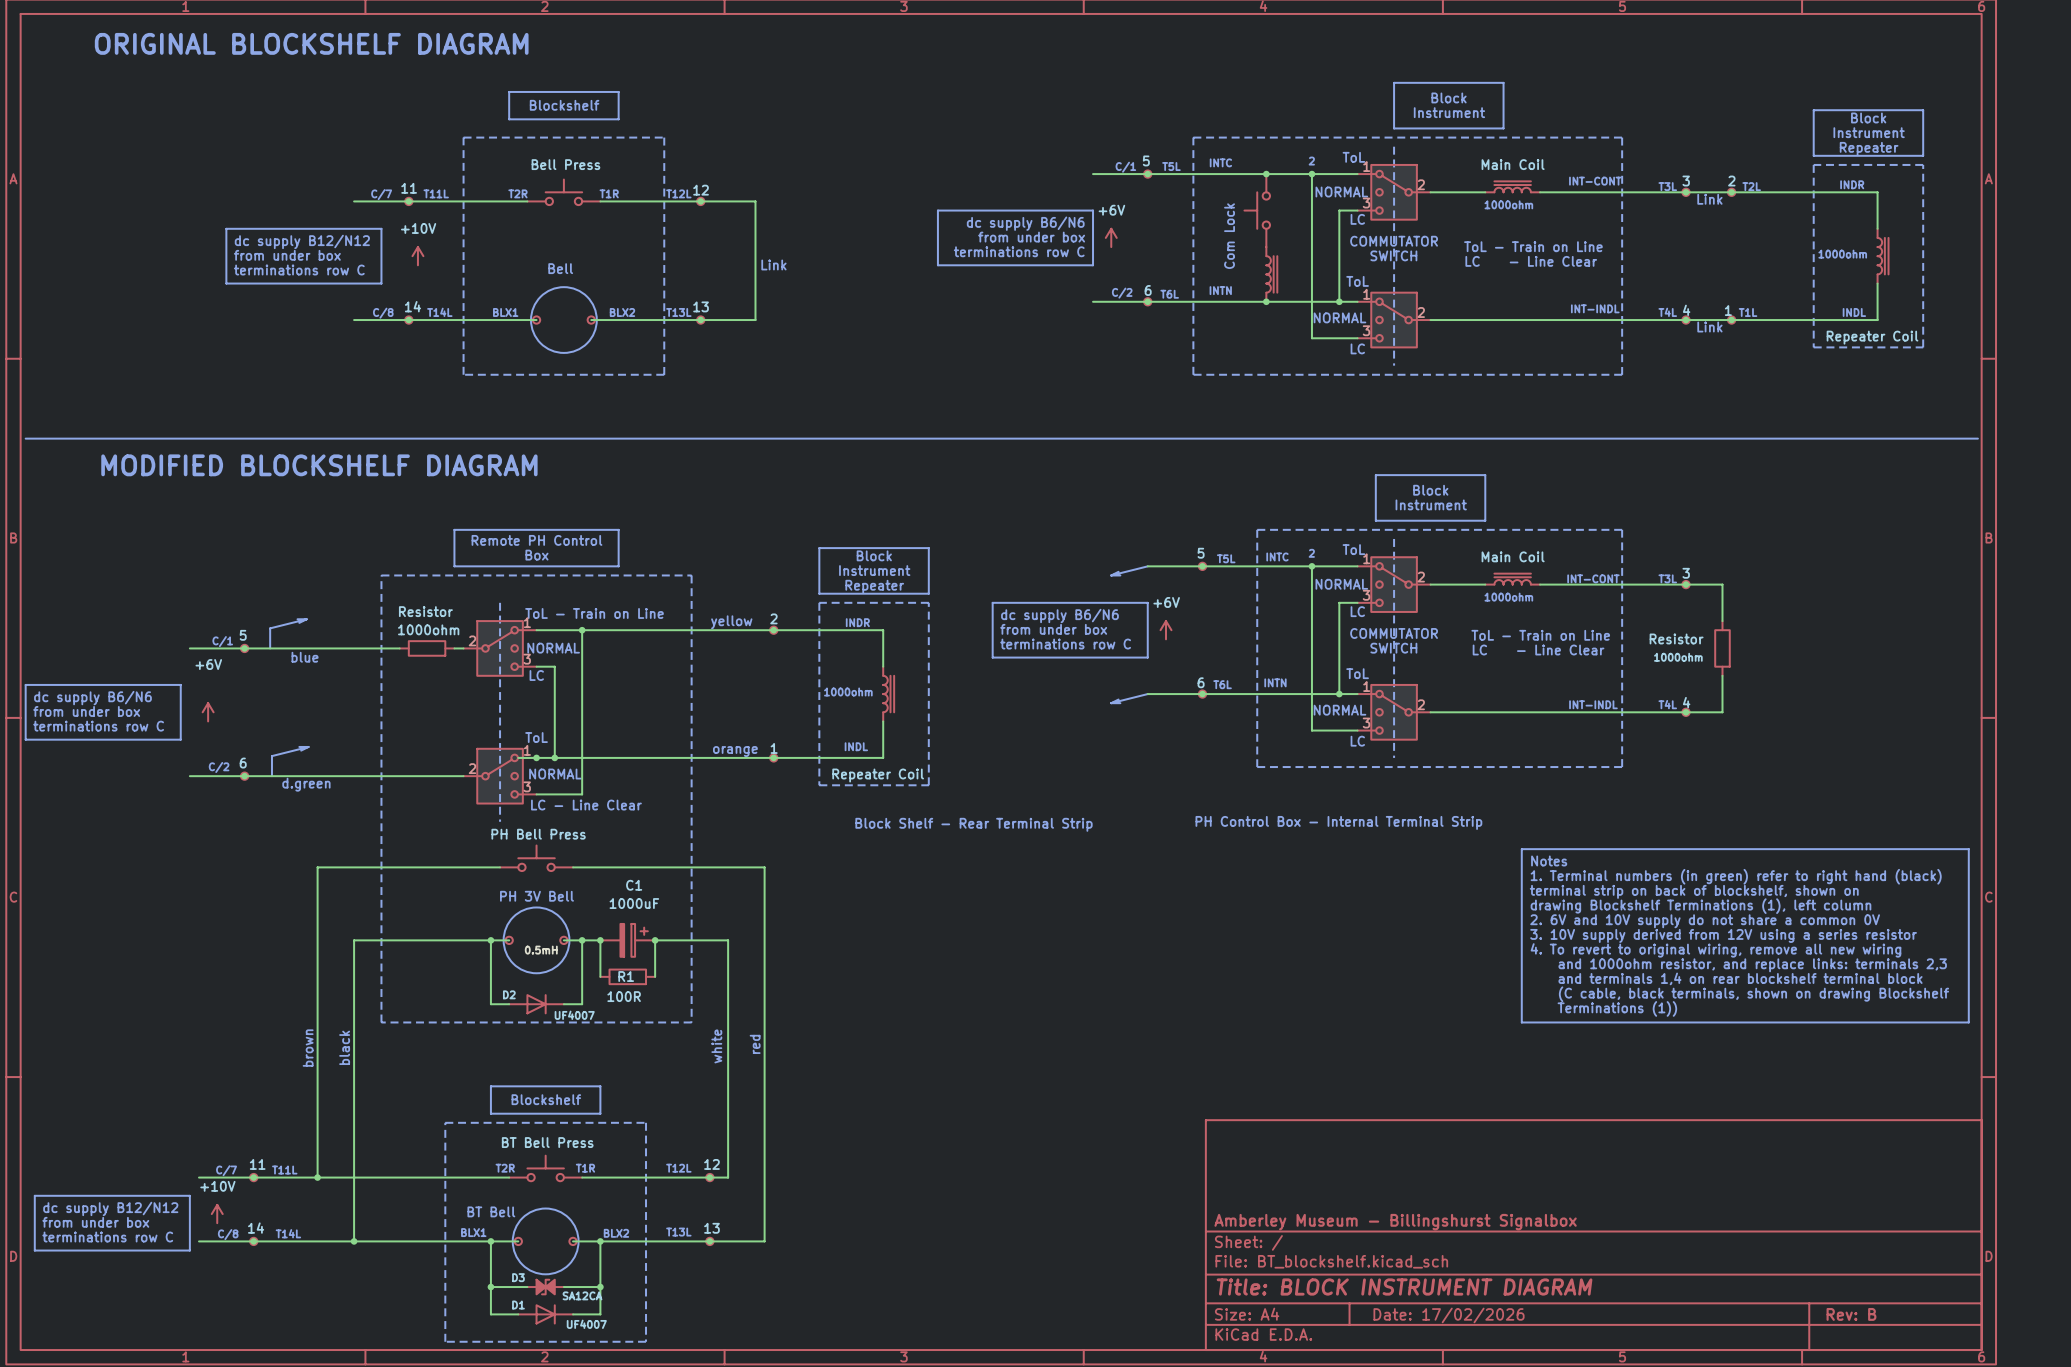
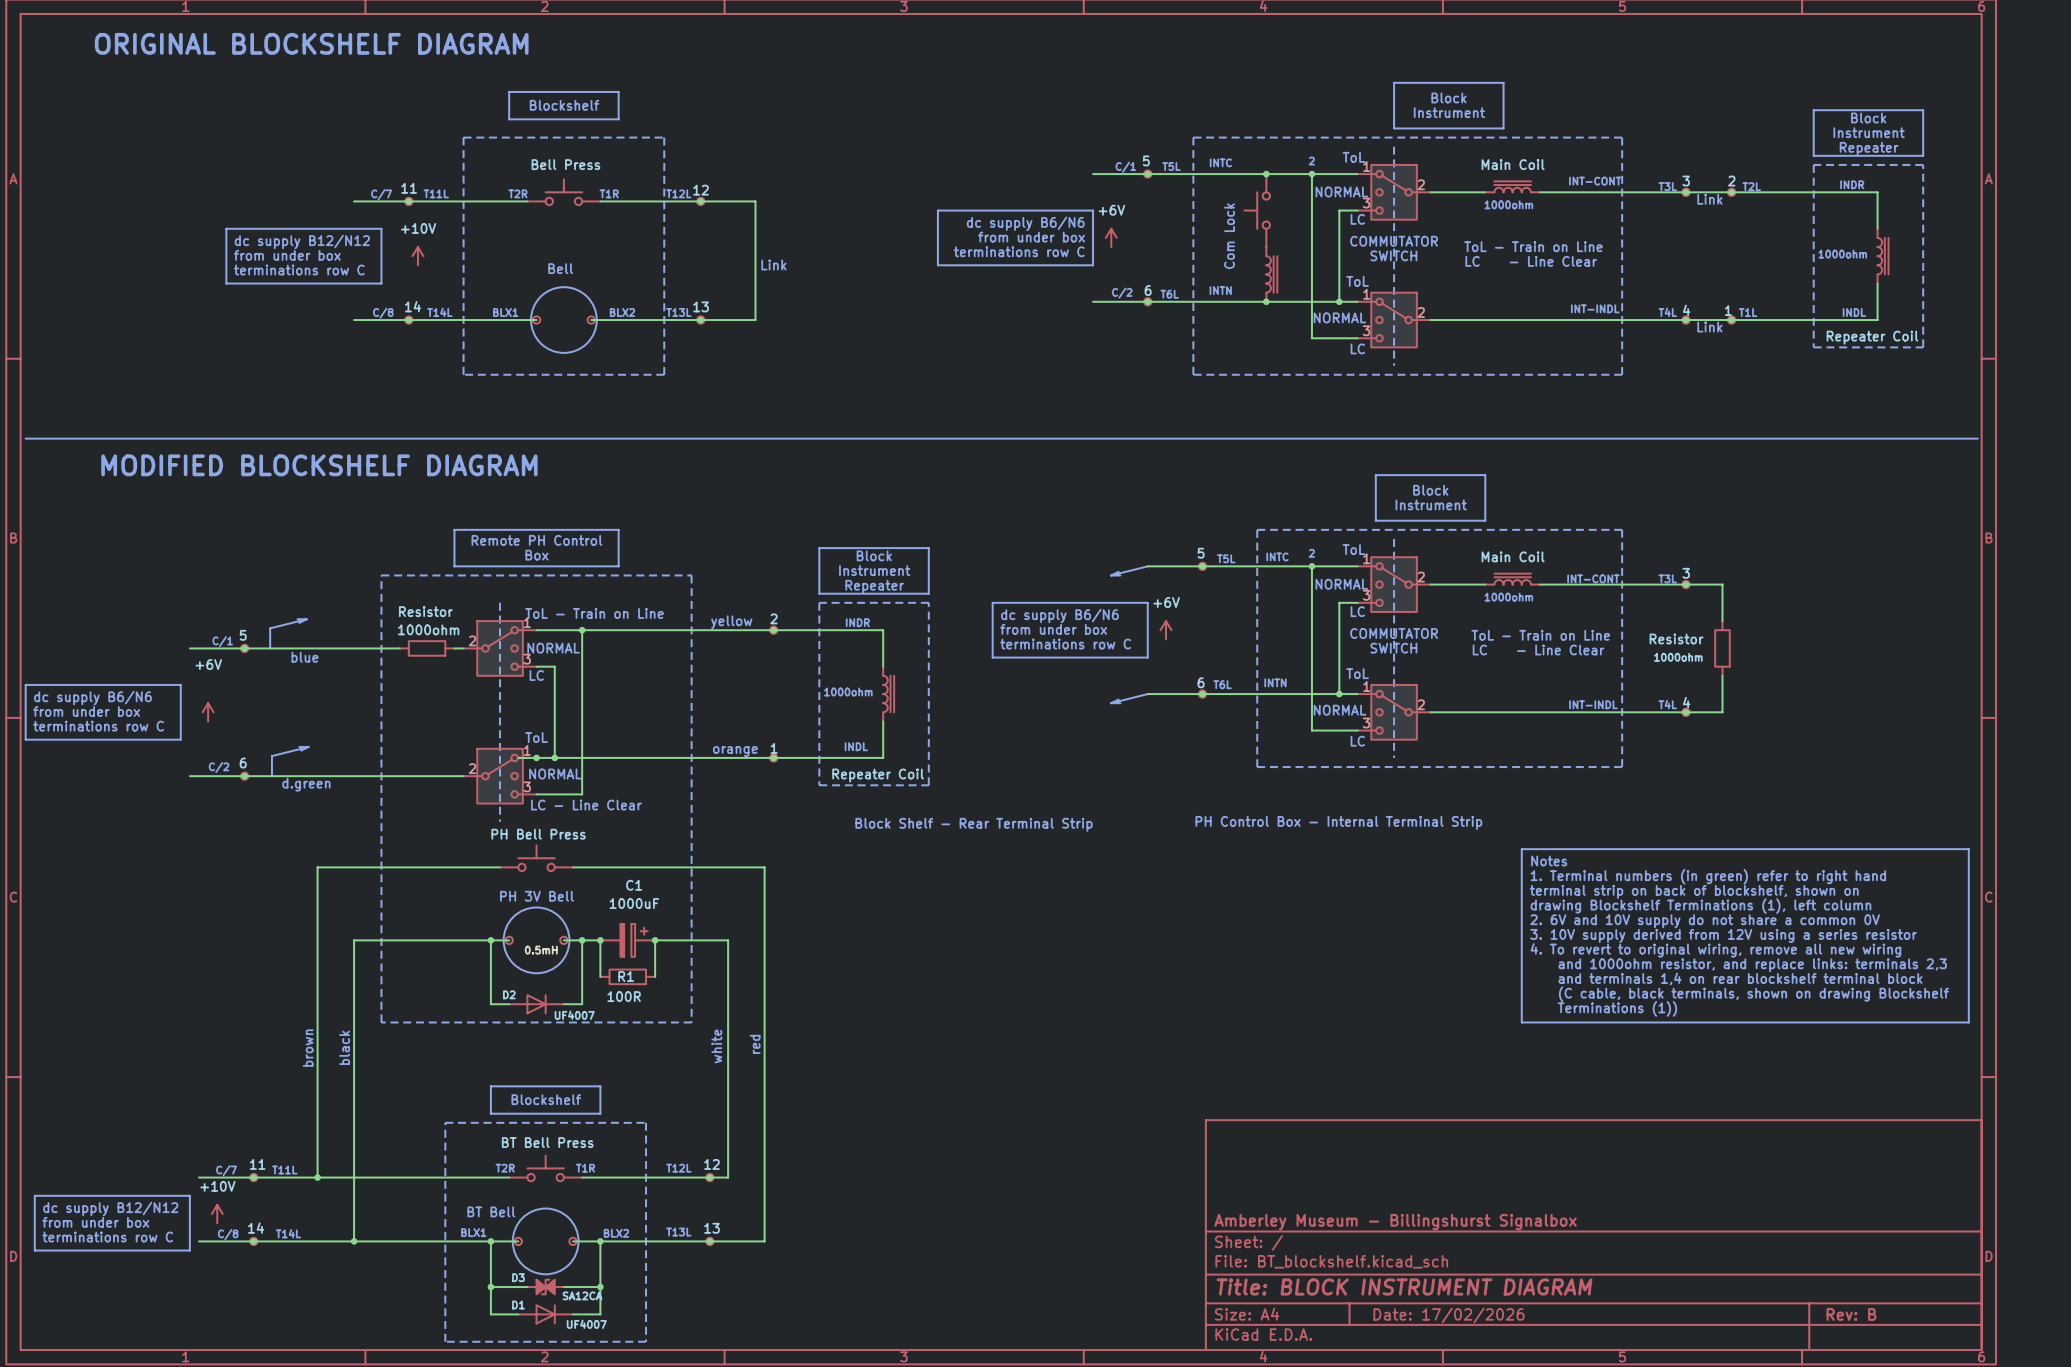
text: 1. Terminal numbers (in green) refer to right hand (black) (1736, 876) -> 1. Terminal numbers (in green) refer to right hand (1708, 876)

